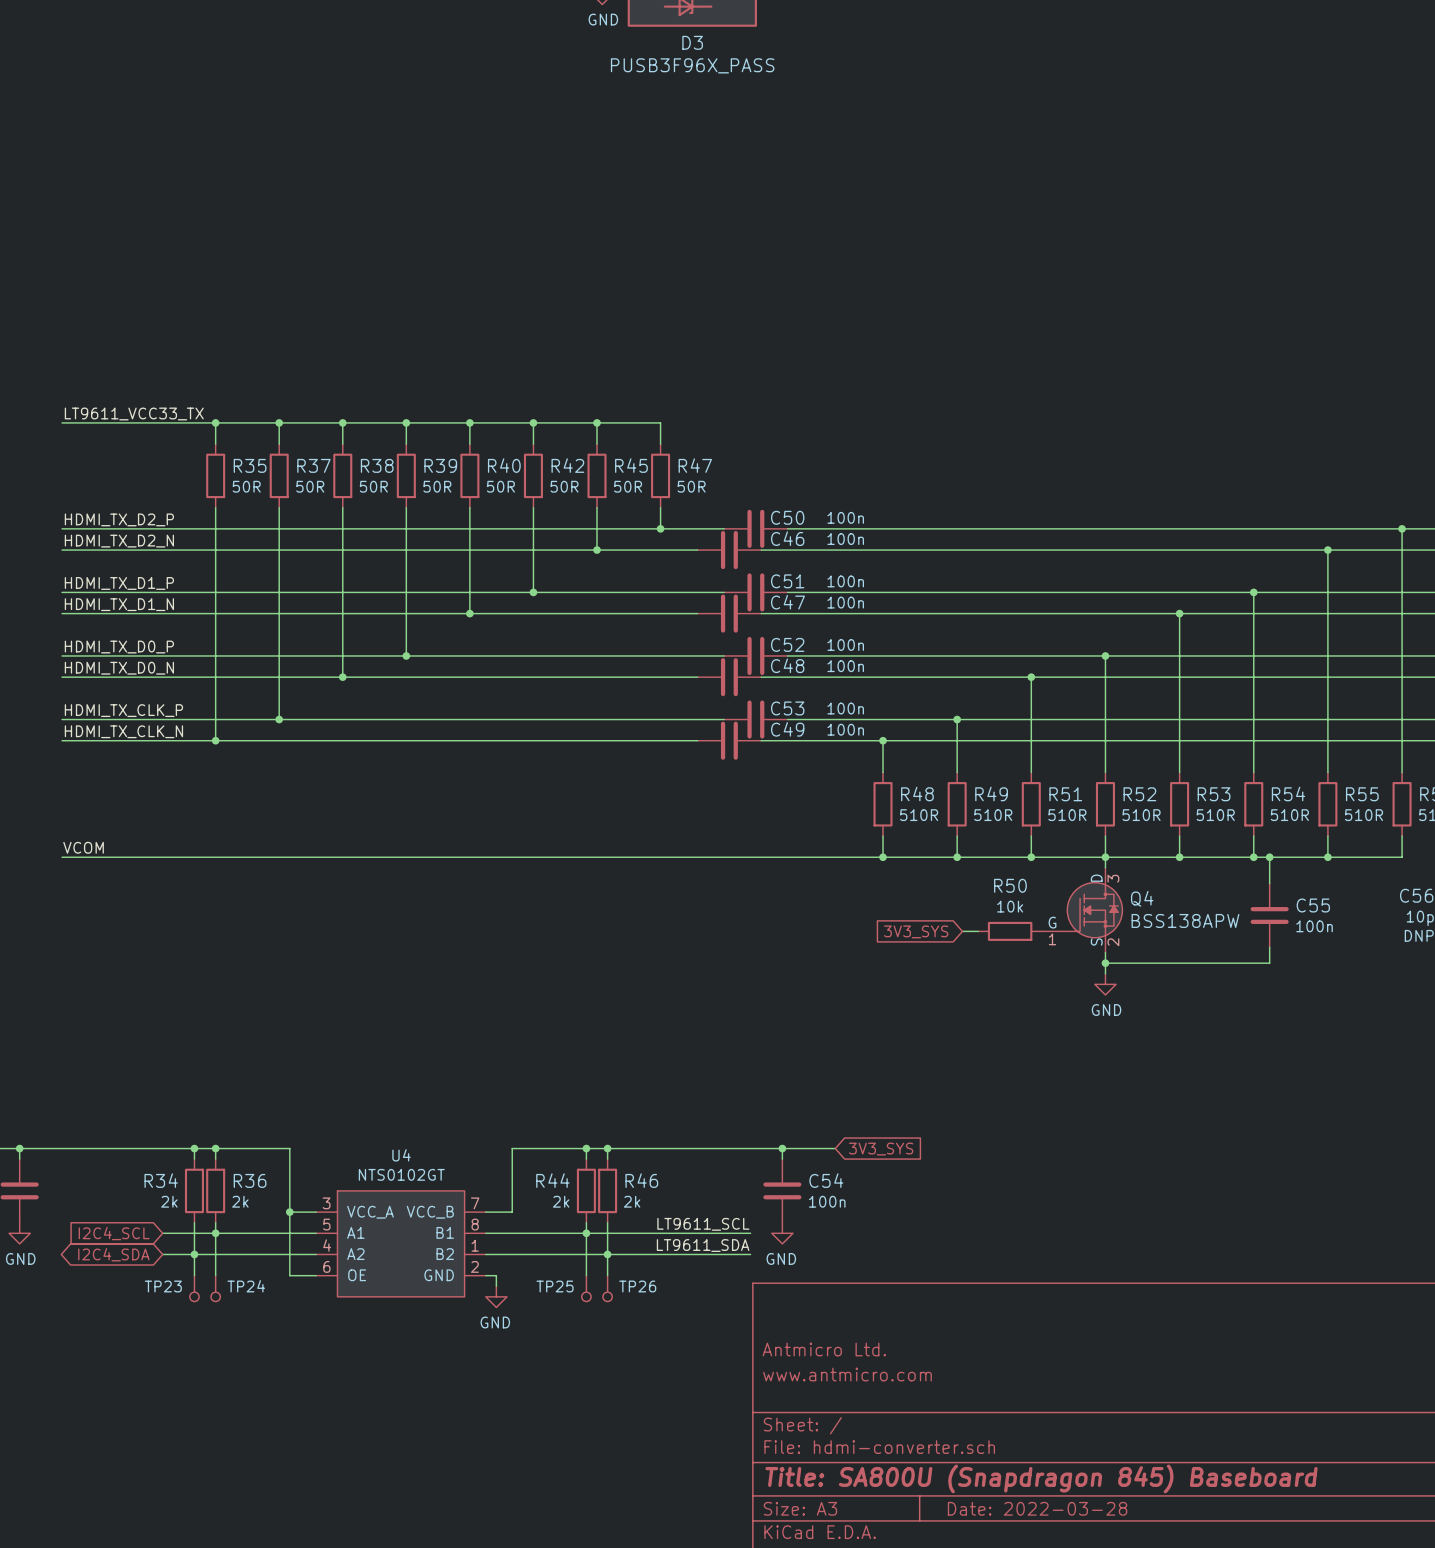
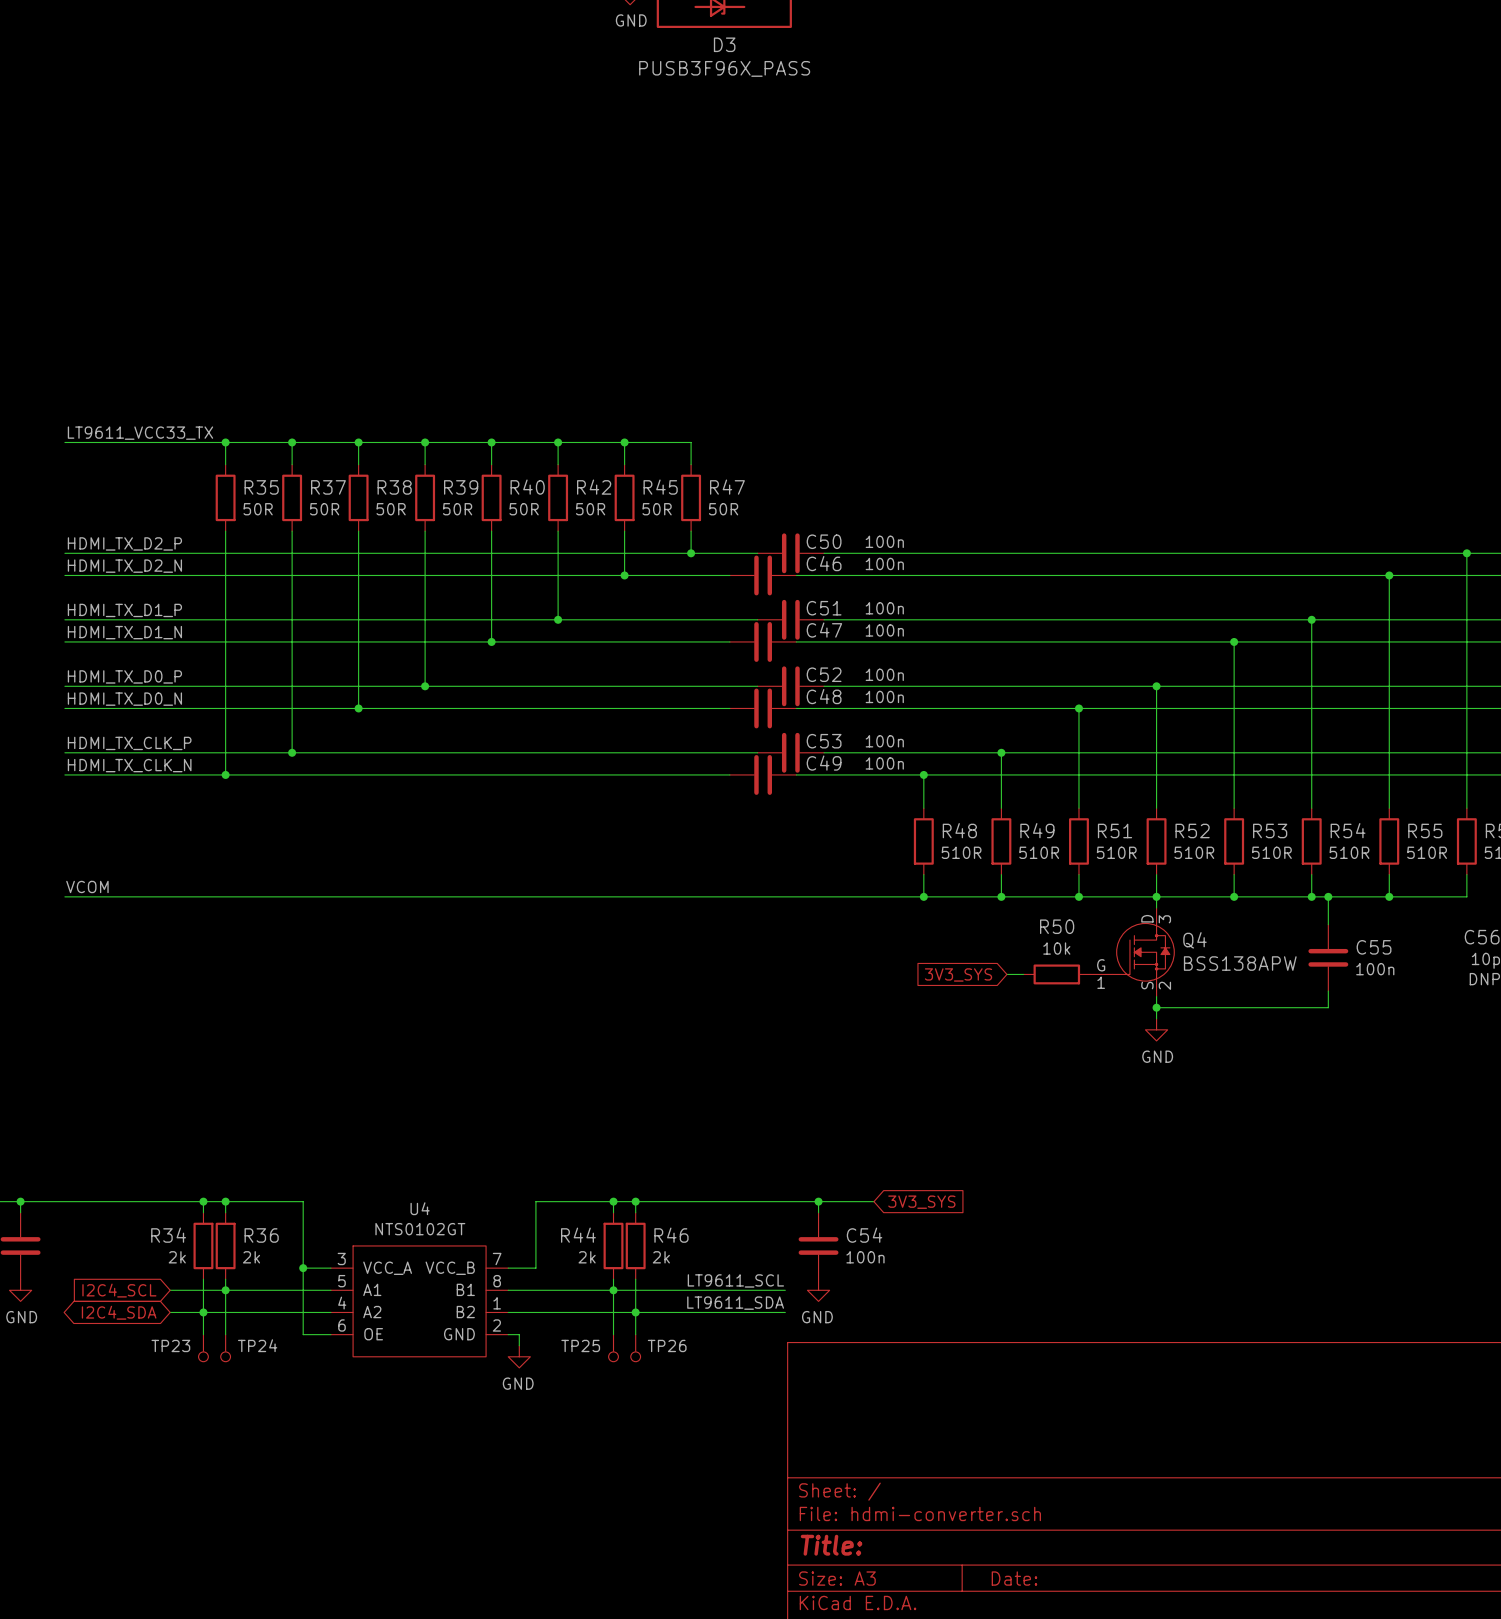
title block: Antmicro Ltd. (824, 1349) -> none
title block: www.antmicro.com (847, 1374) -> none
title block: Title: SA800U (Snapdragon 845) Baseboard (1041, 1478) -> Title: (831, 1545)
title block: Date: 2022-03-28 (1037, 1508) -> Date: (1014, 1578)

